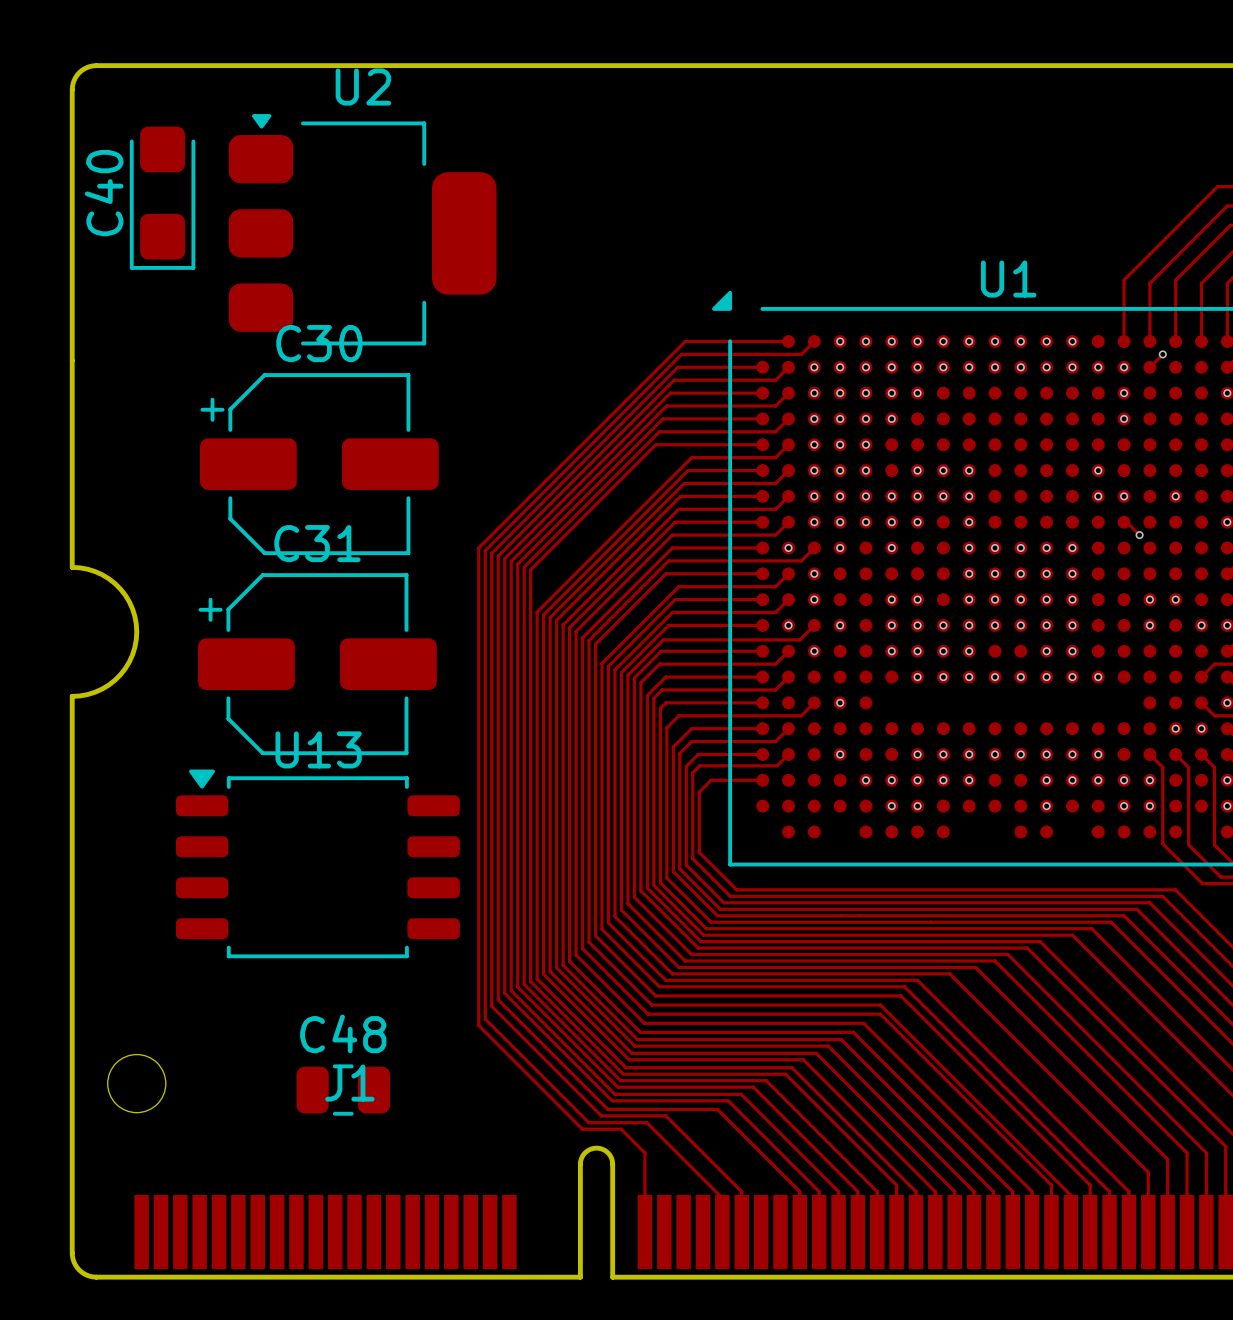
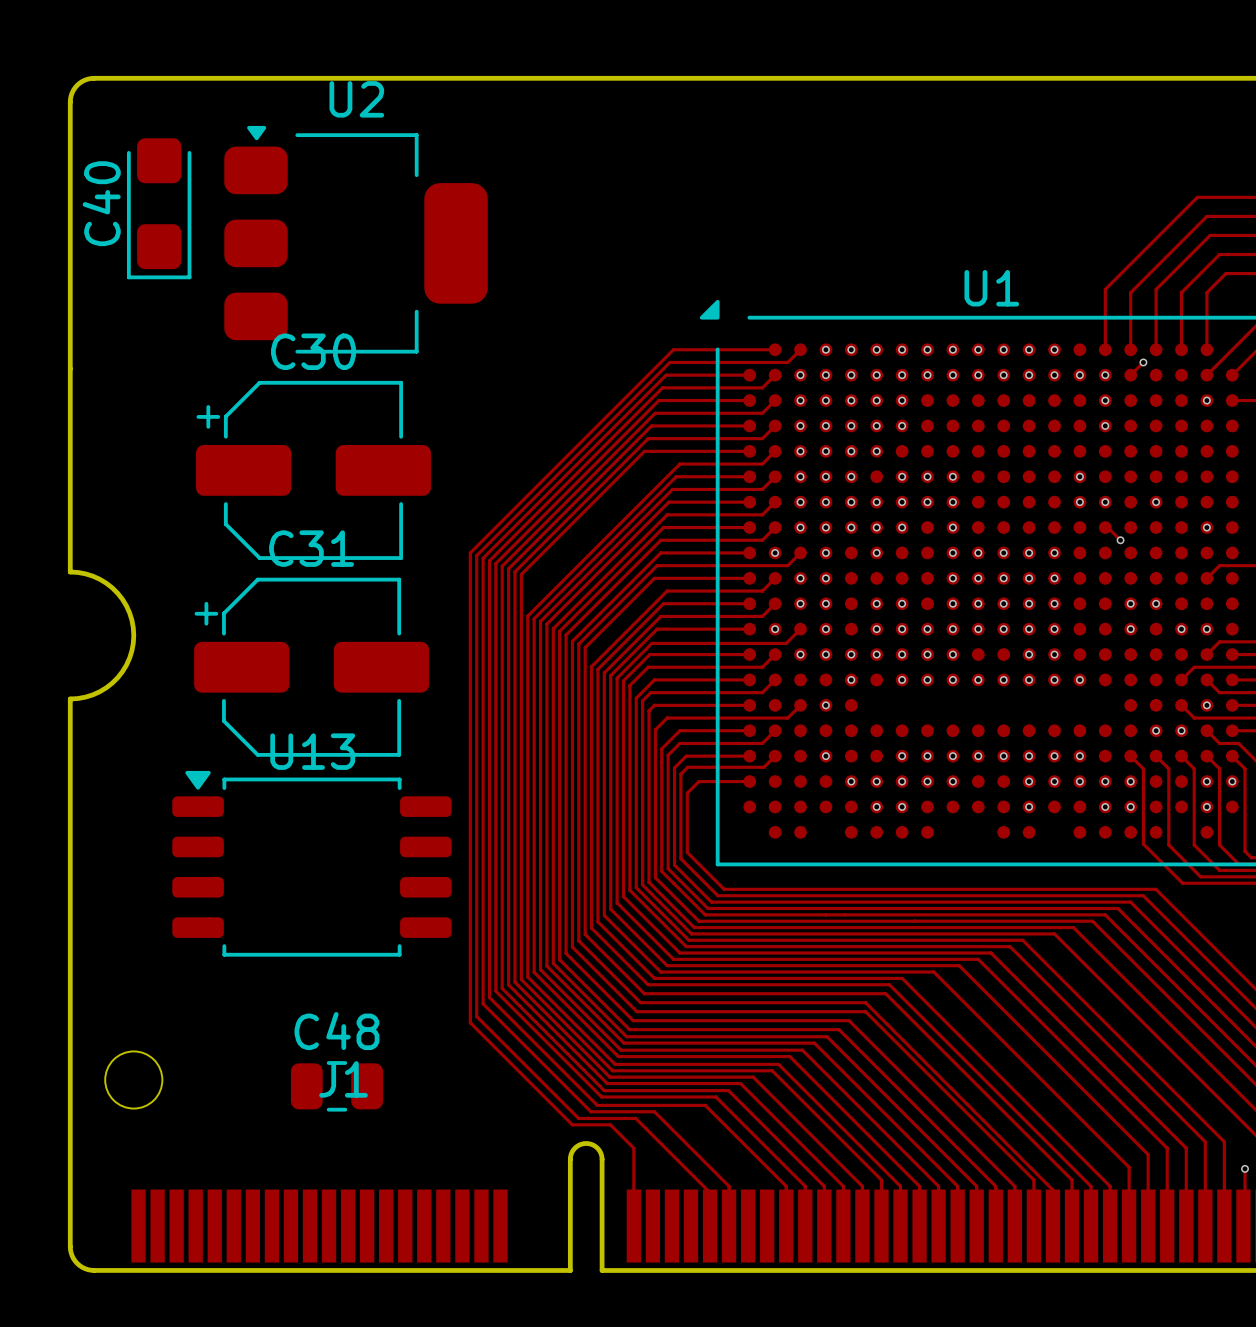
via: none -> (902, 425)
via: none -> (876, 451)
via: none -> (825, 578)
via: none -> (825, 603)
via: none -> (825, 654)
via: none -> (851, 654)
via: none -> (851, 679)

